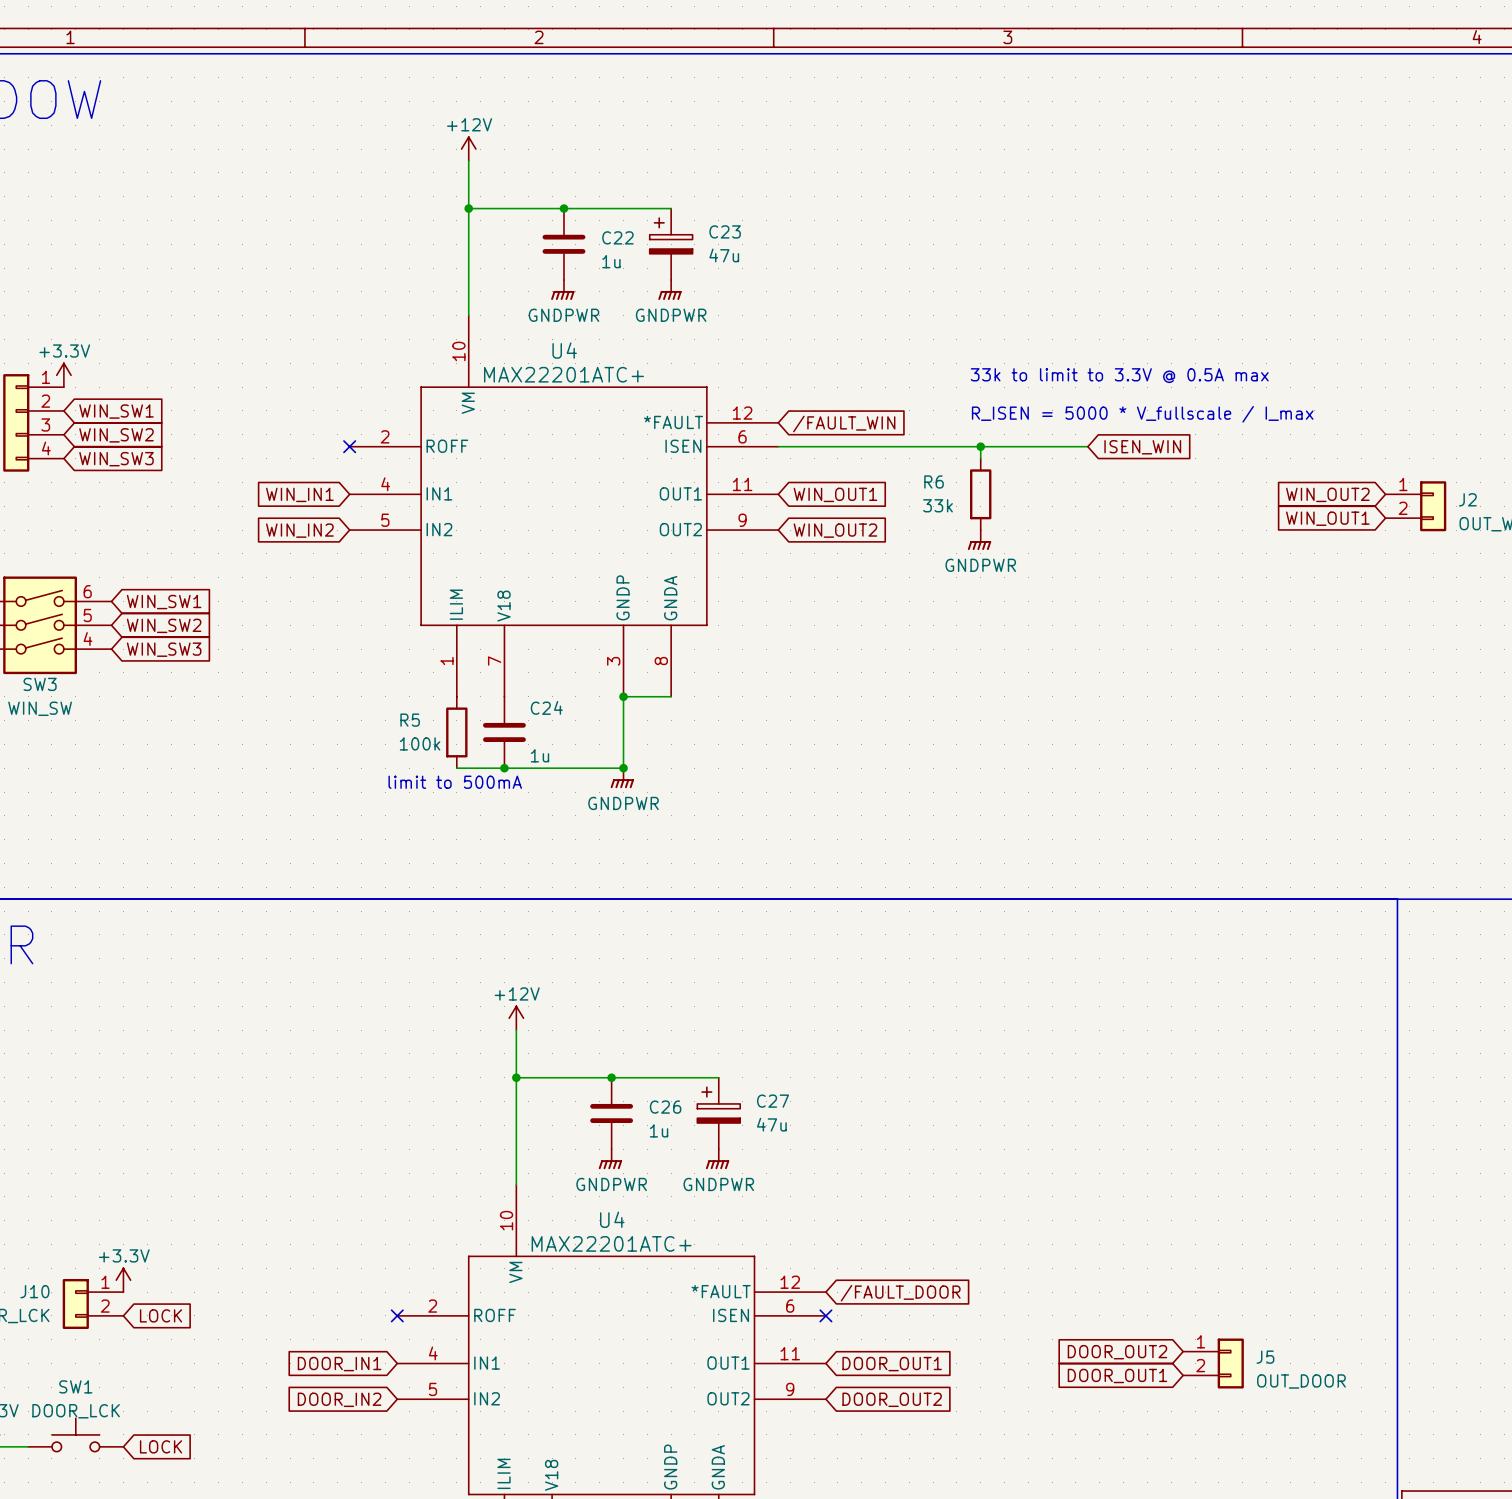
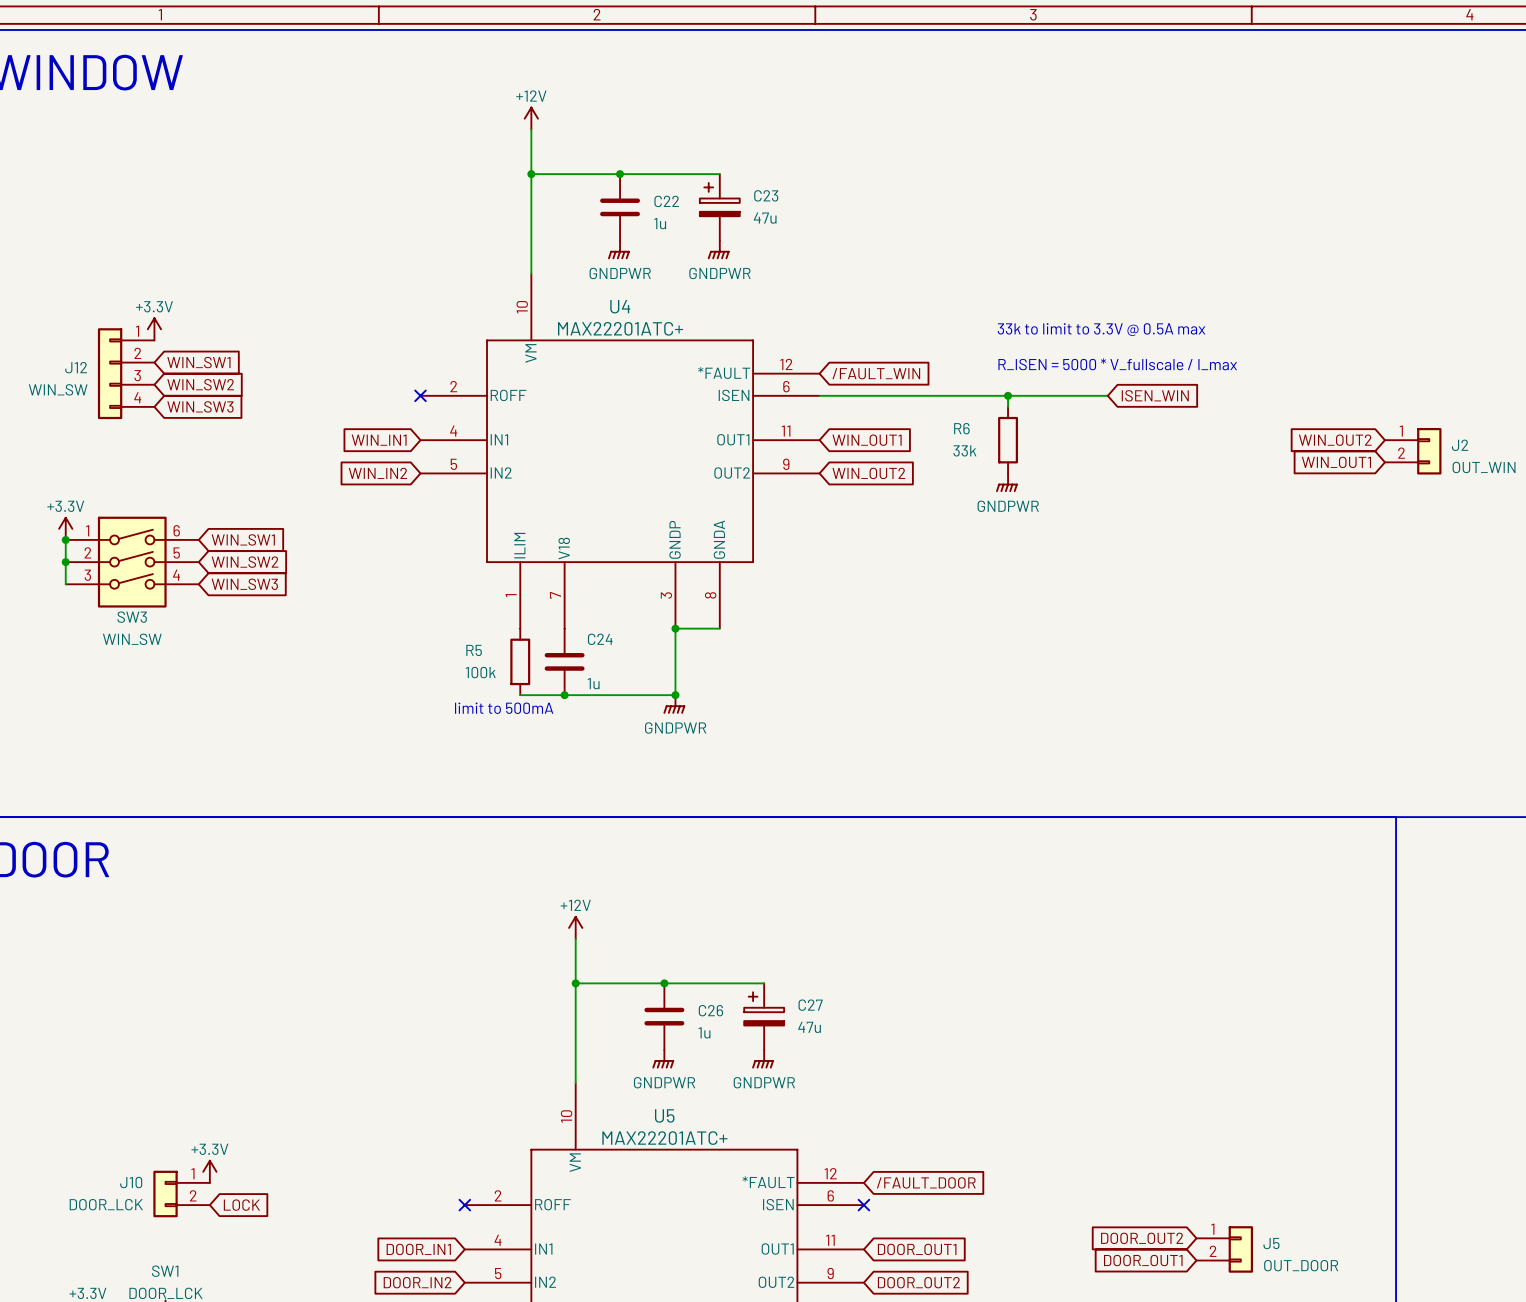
U4 name: U4 (612, 1219) -> U5 (664, 1115)

